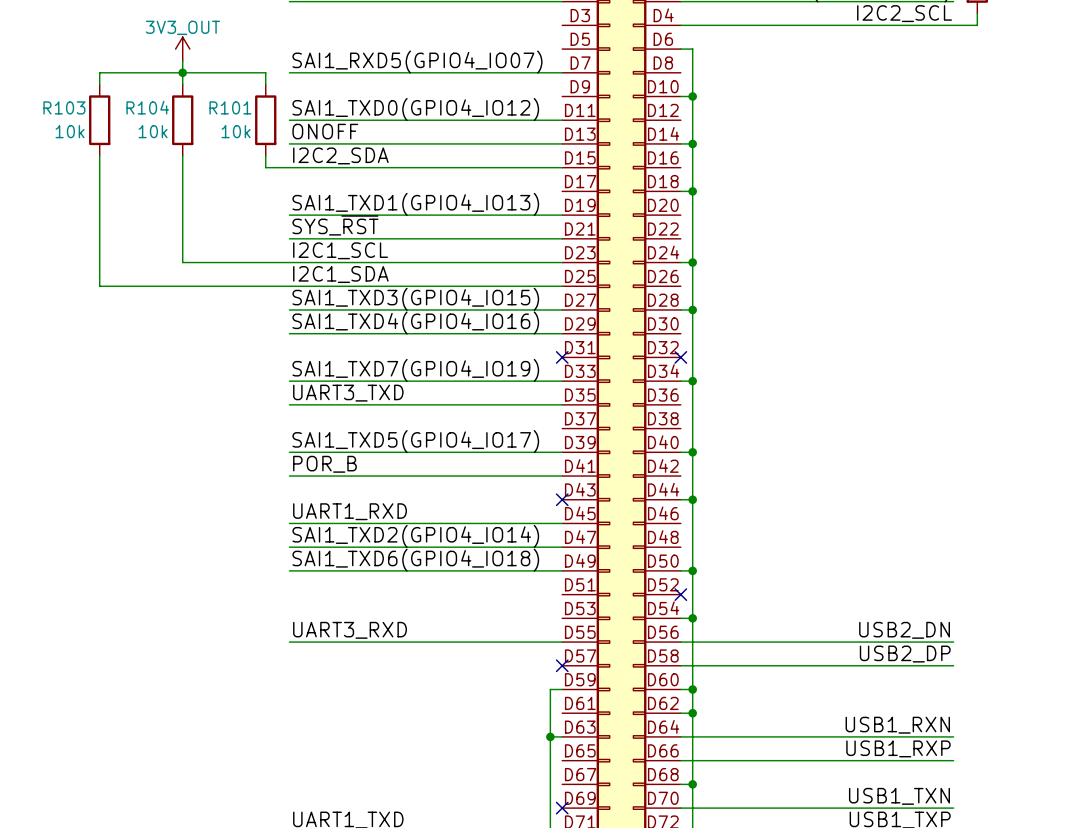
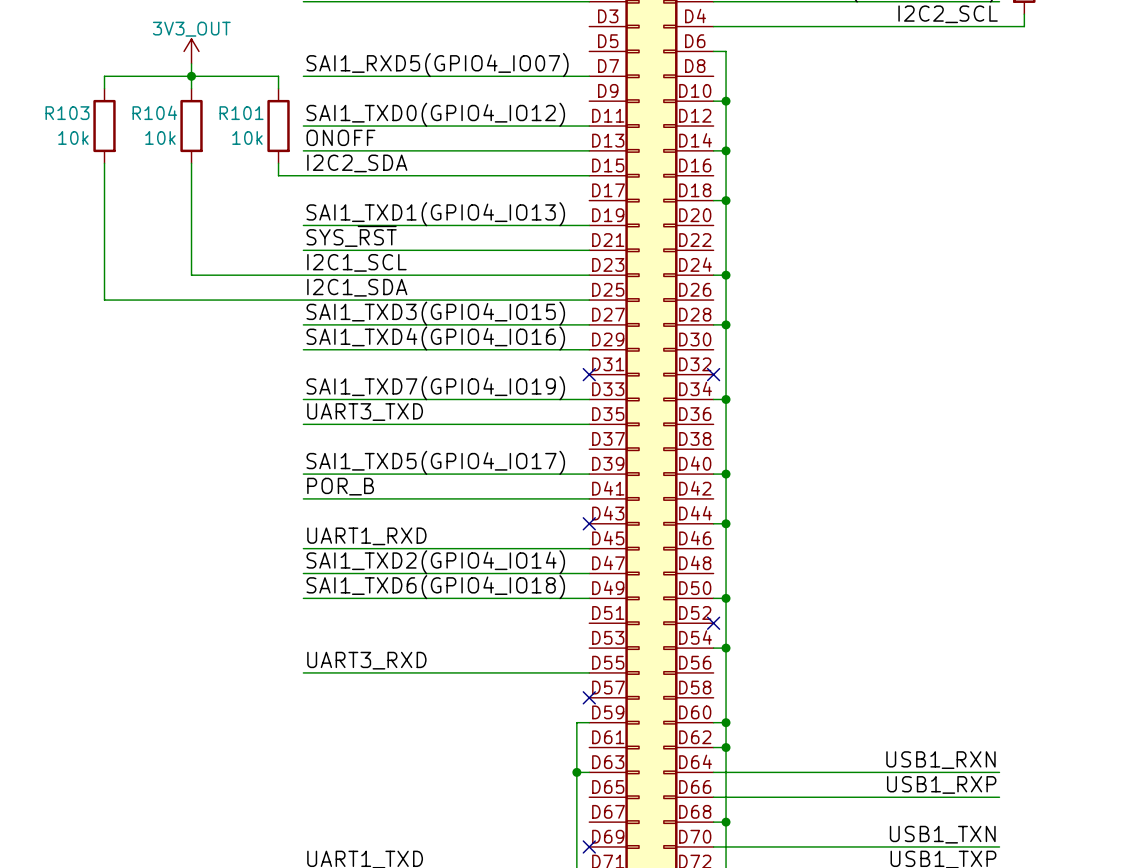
label: USB2_DN (904, 630) -> none
wire: (680, 642) (953, 642) -> none
label: USB2_DP (905, 654) -> none
wire: (680, 665) (953, 665) -> none

